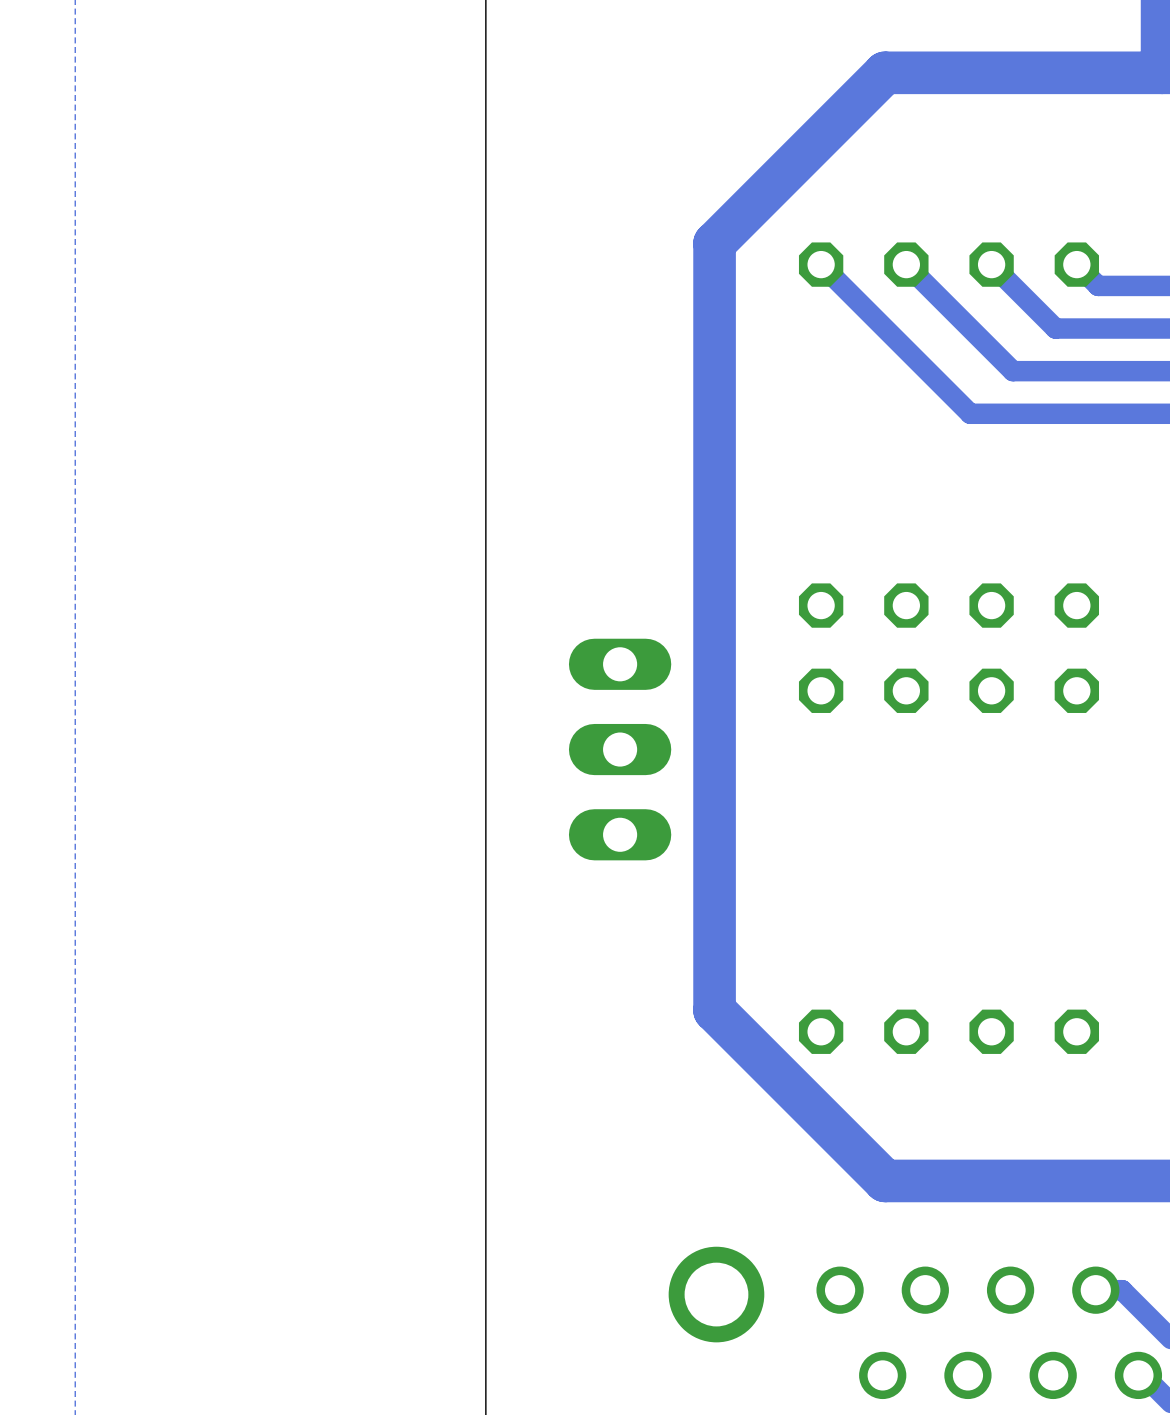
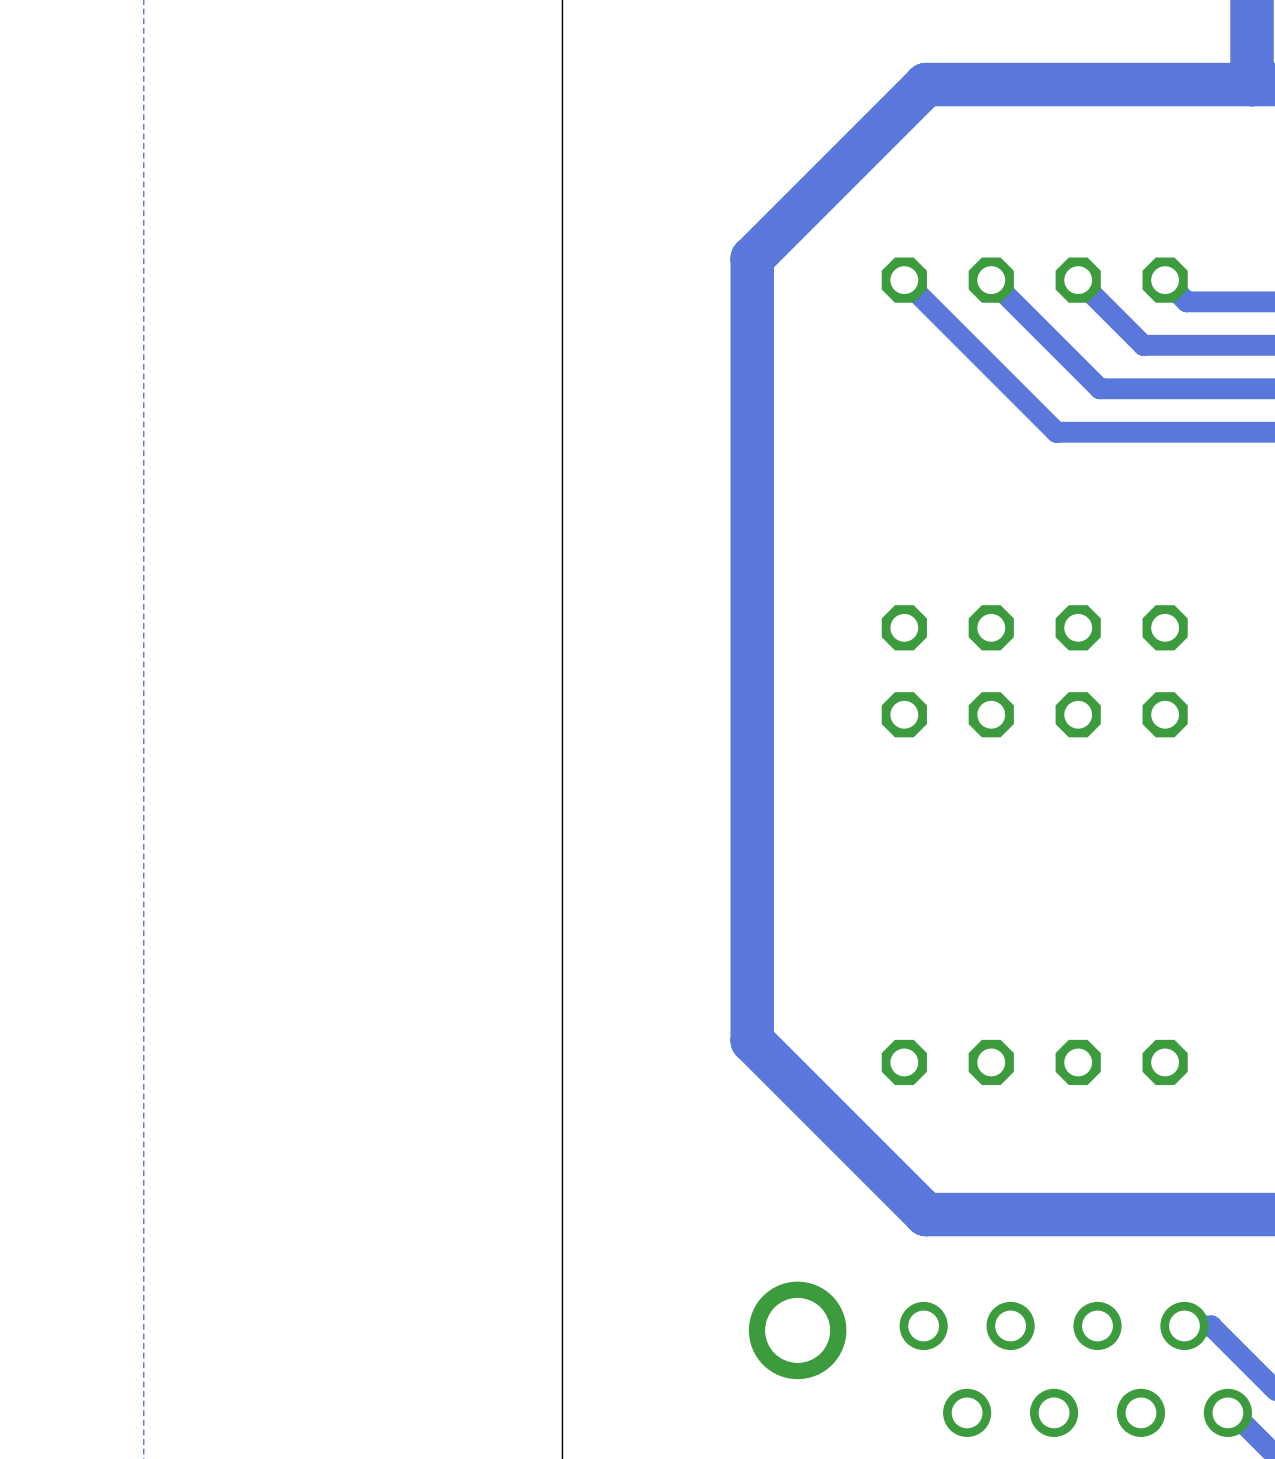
track: (885, 72) (714, 243) (714, 1010) (885, 1180) -> (969, 84) (926, 84) (752, 258) (752, 1040) (926, 1214) (969, 1214)
part: (620, 749) -> none

